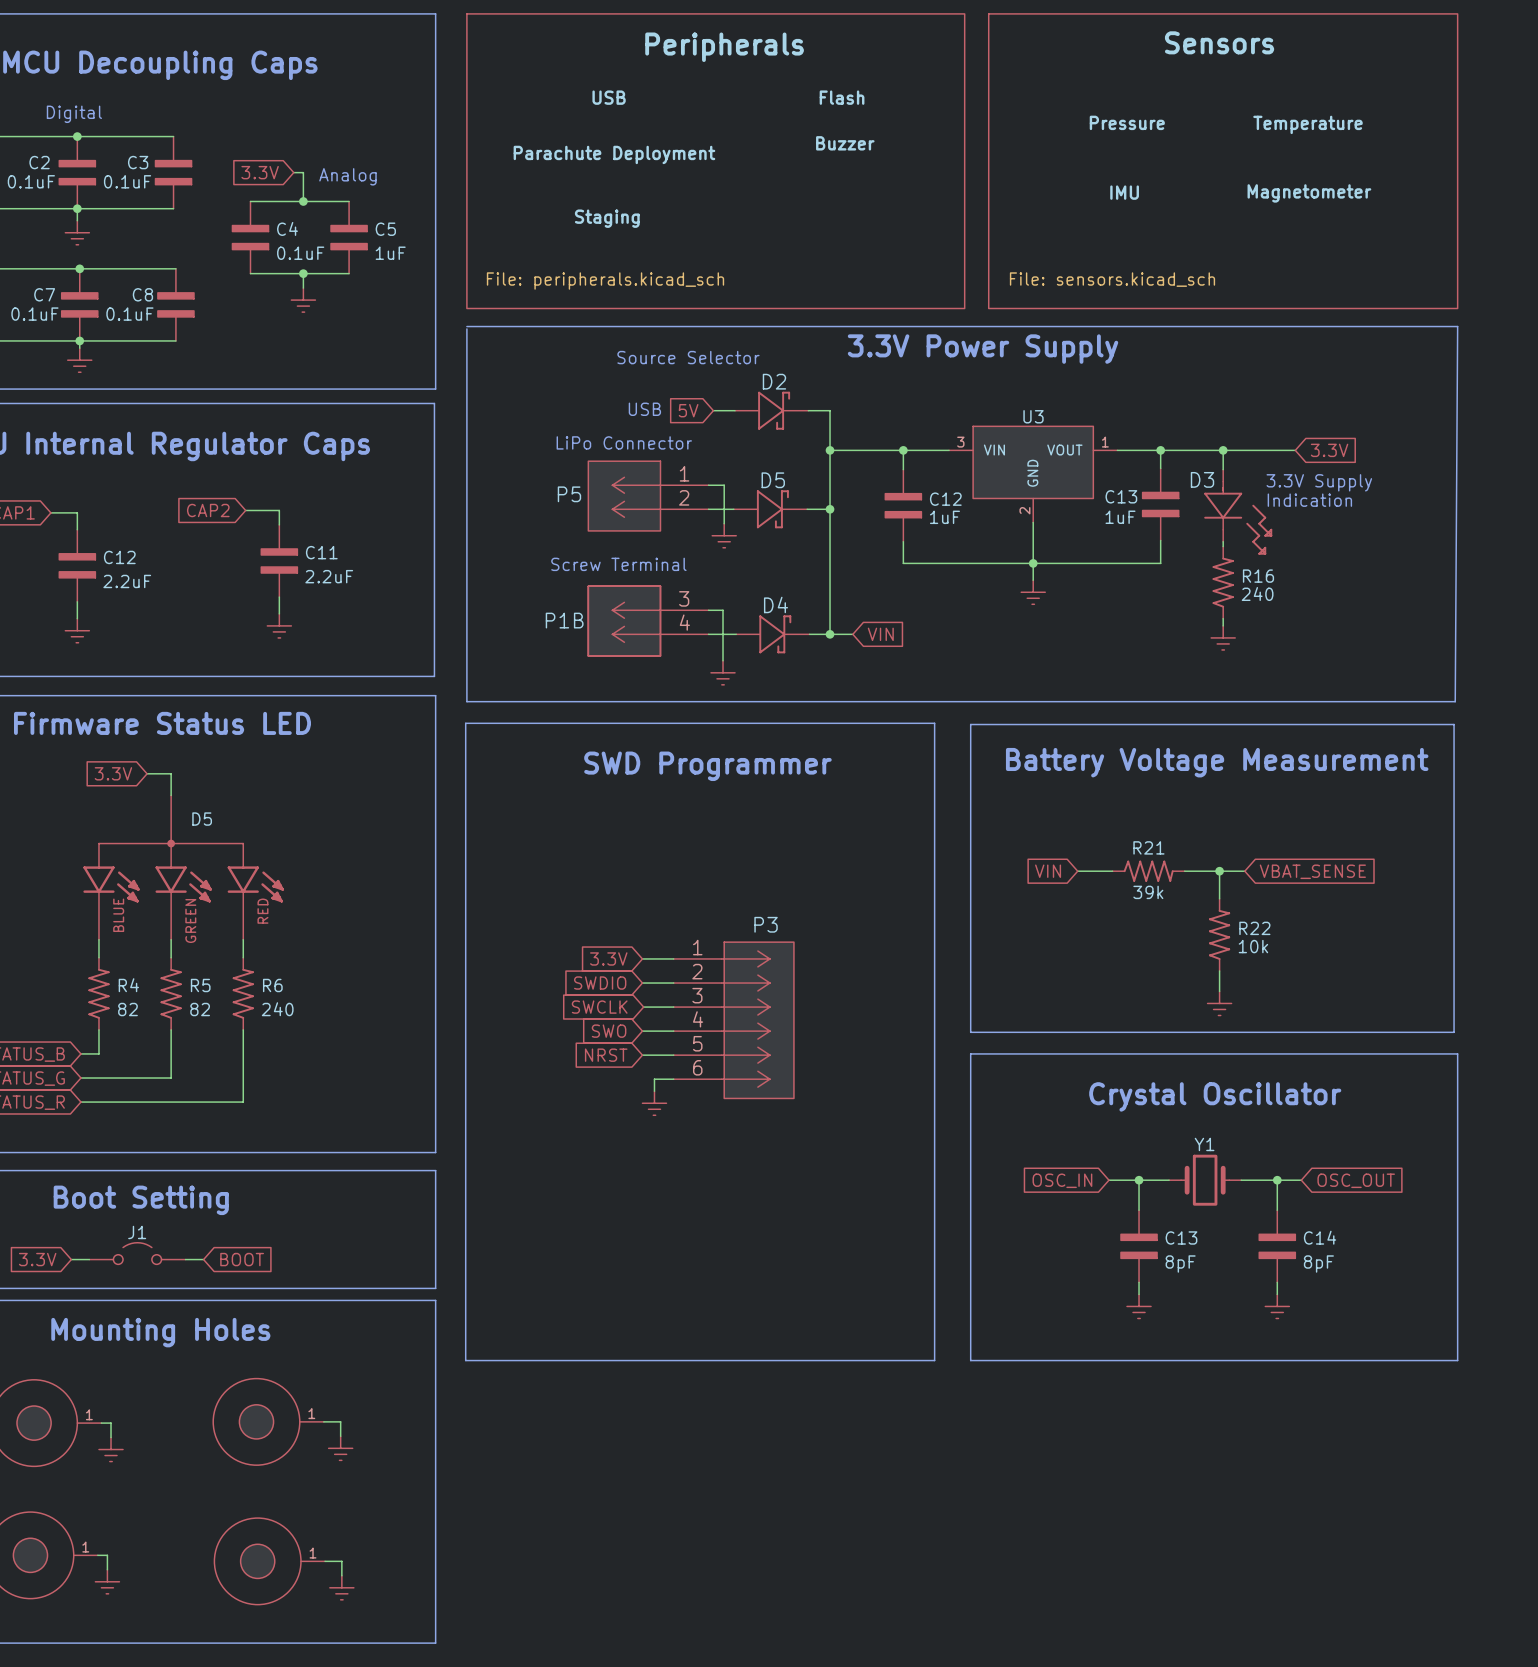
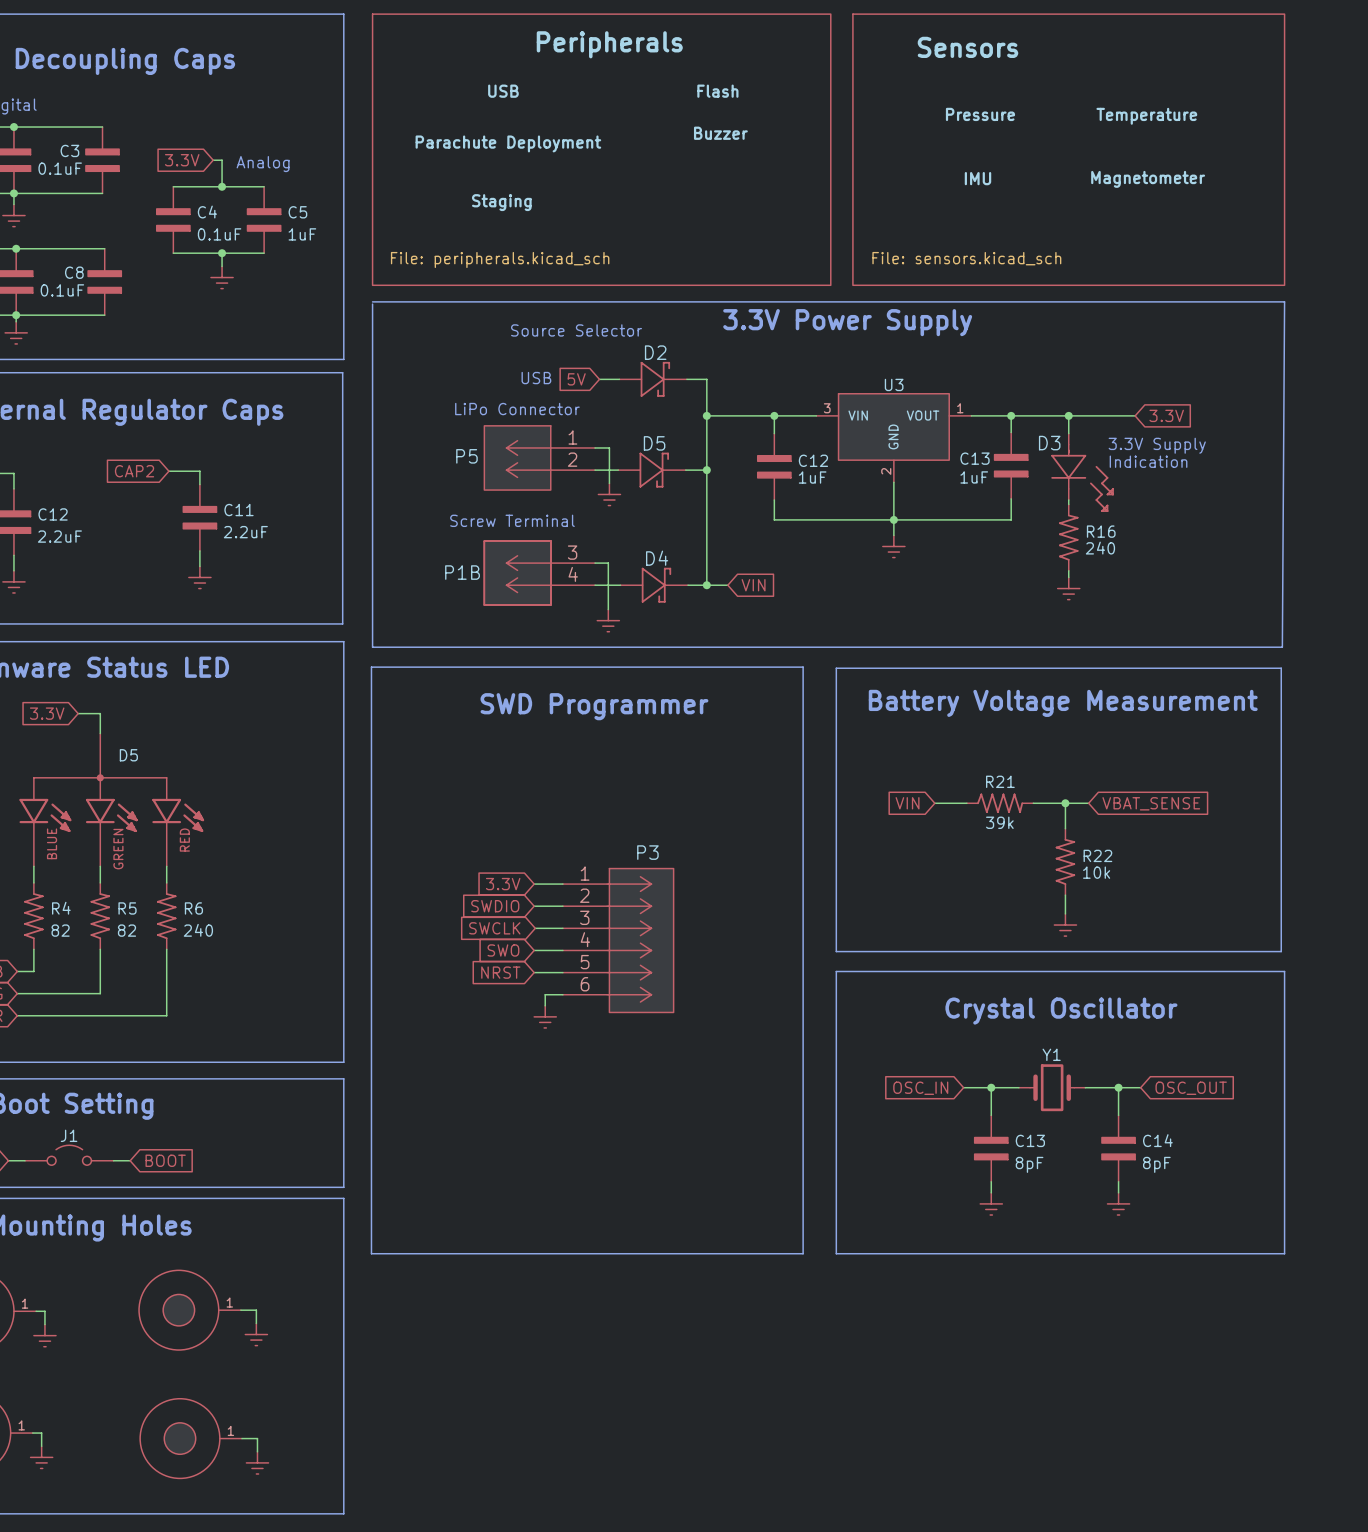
sheet Sensors name position: Sensors (1219, 42) -> Sensors (967, 47)

